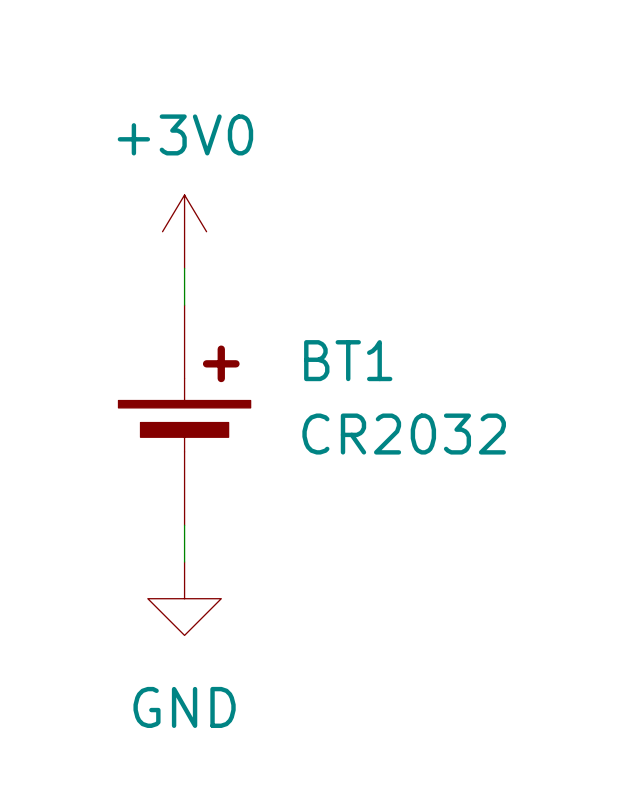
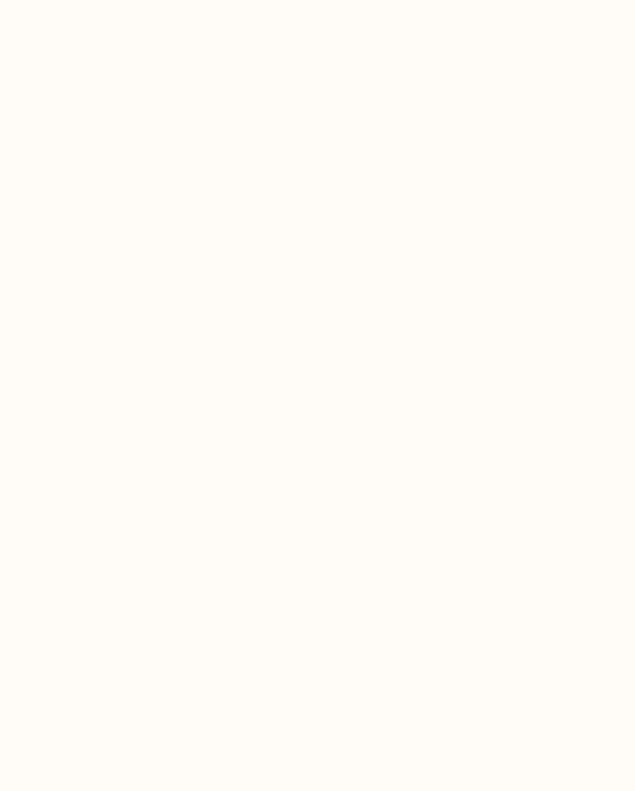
power symbol: +3V0 (184, 231) -> none
wire: (184, 268) (184, 305) -> none
BT1: CR2032 (184, 415) -> none
wire: (184, 525) (184, 562) -> none
power symbol: GND (184, 598) -> none

